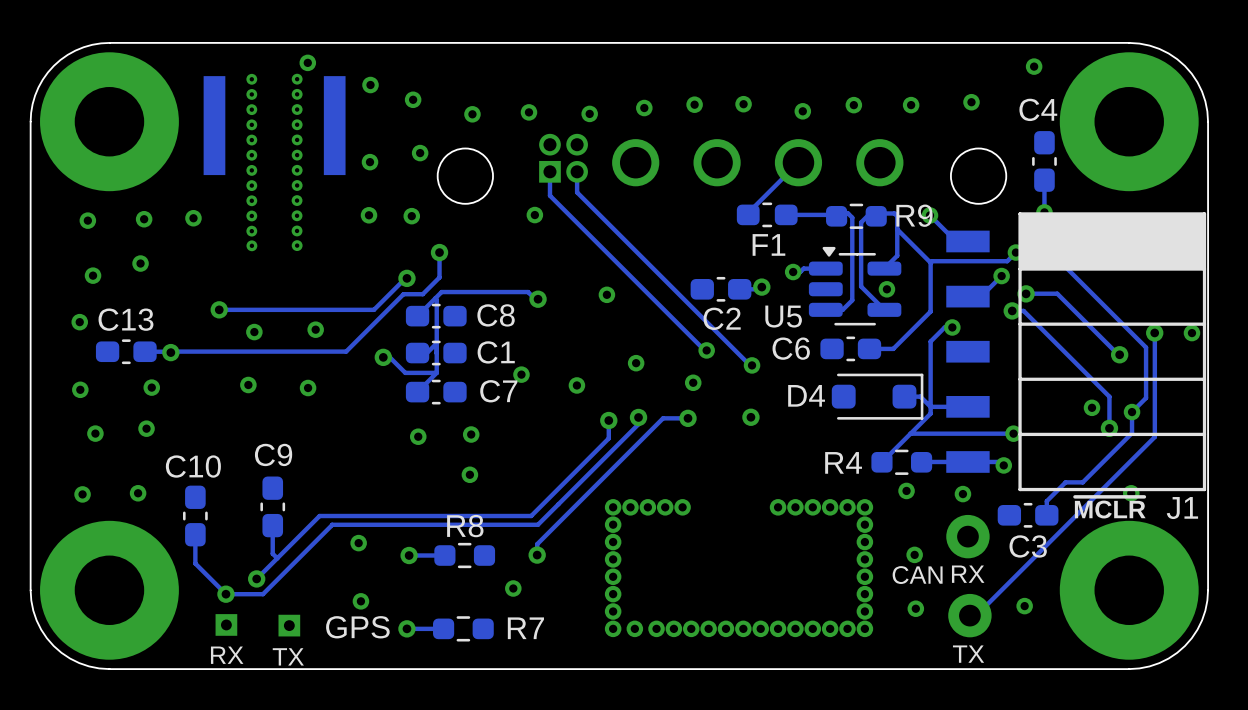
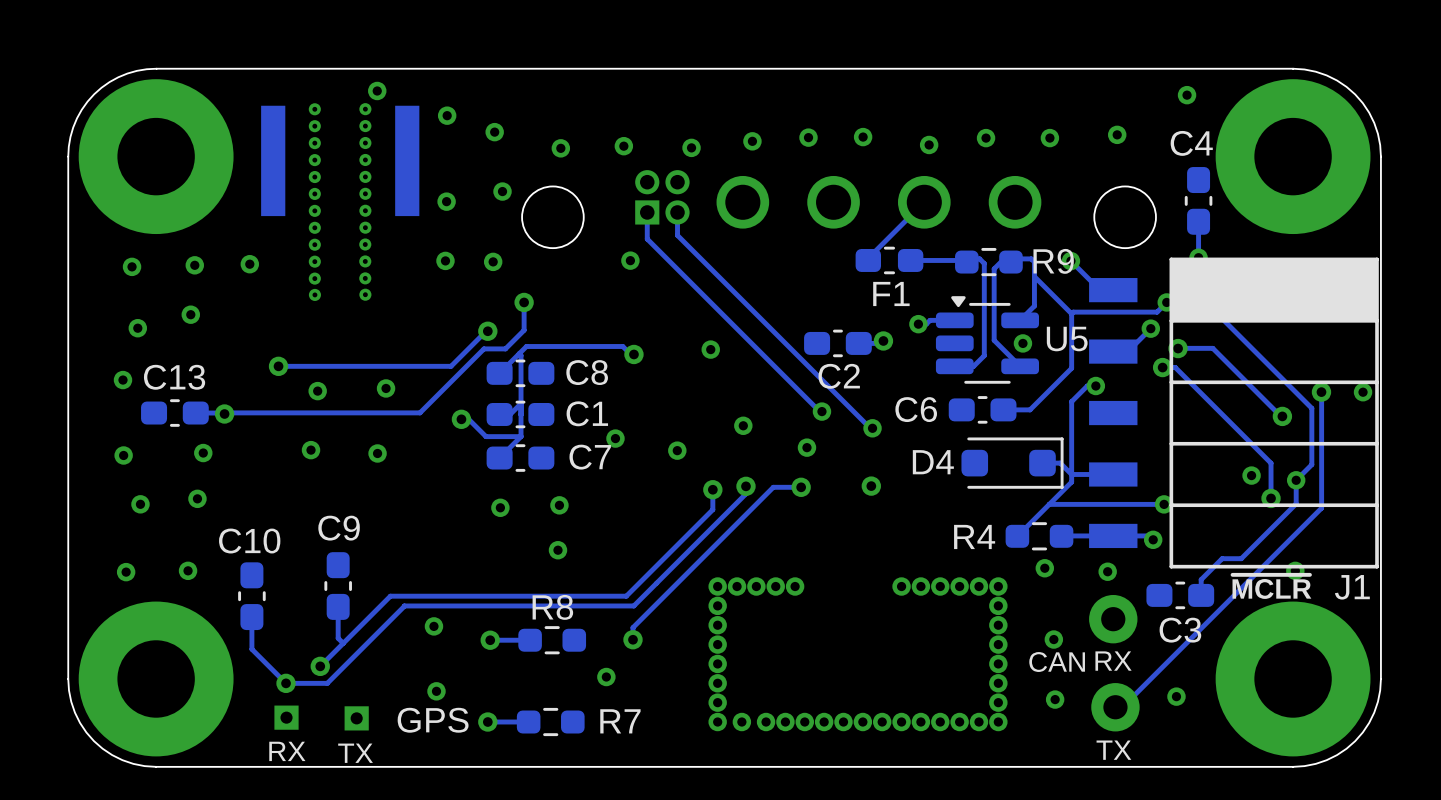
U5 name position: U5 (783, 316) -> U5 (1067, 339)

